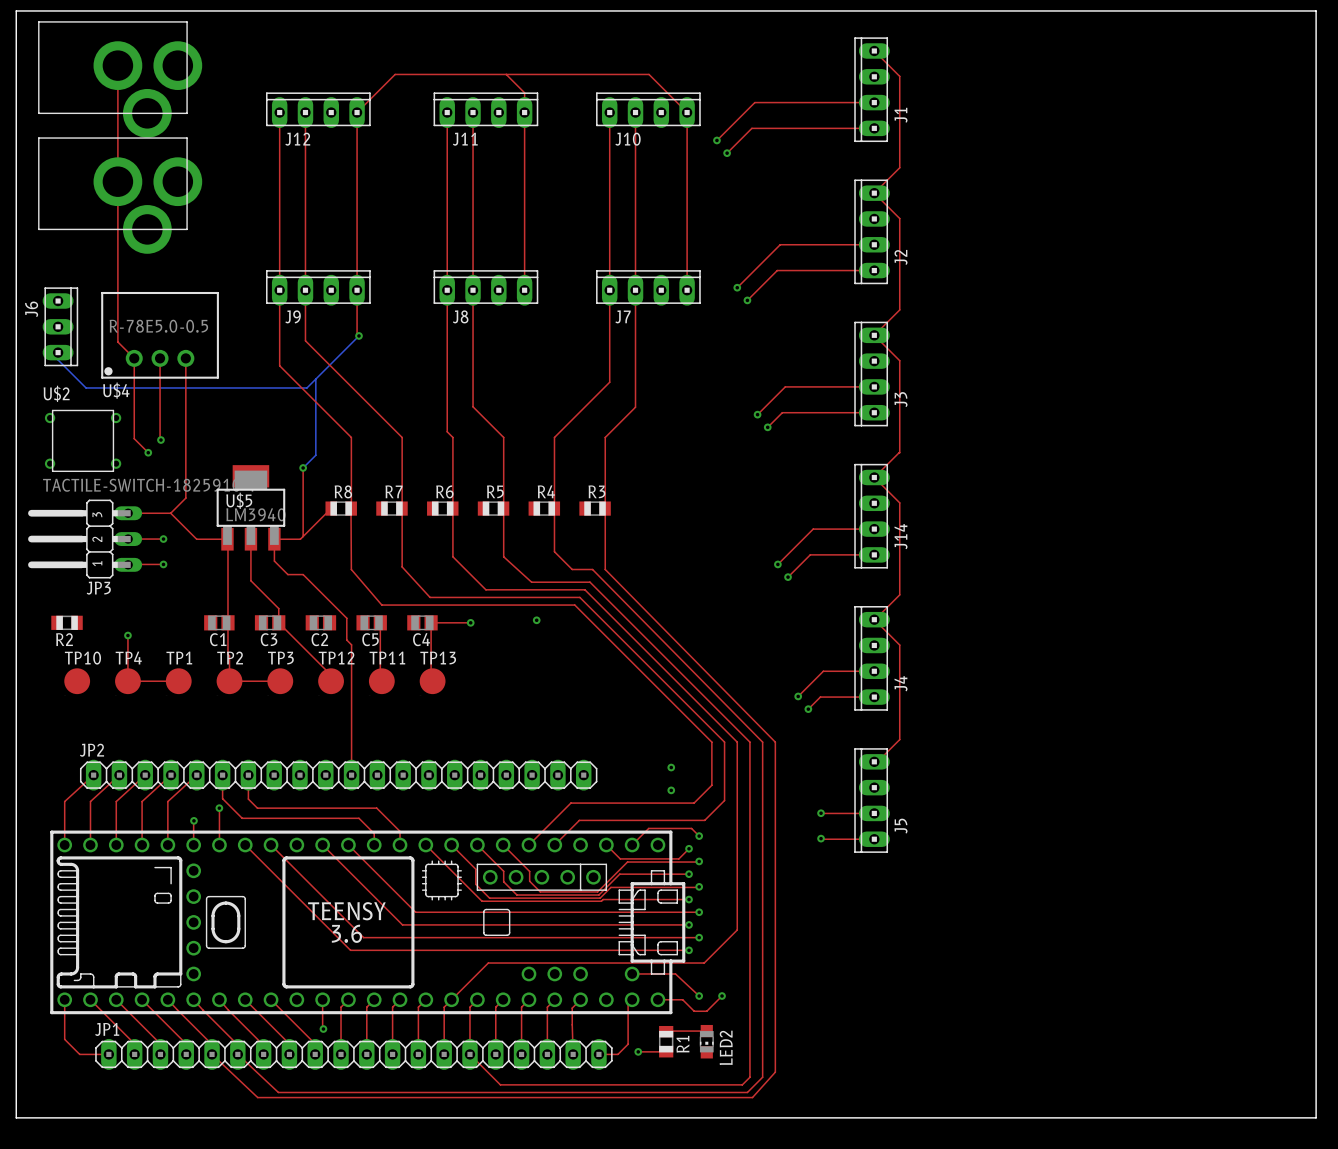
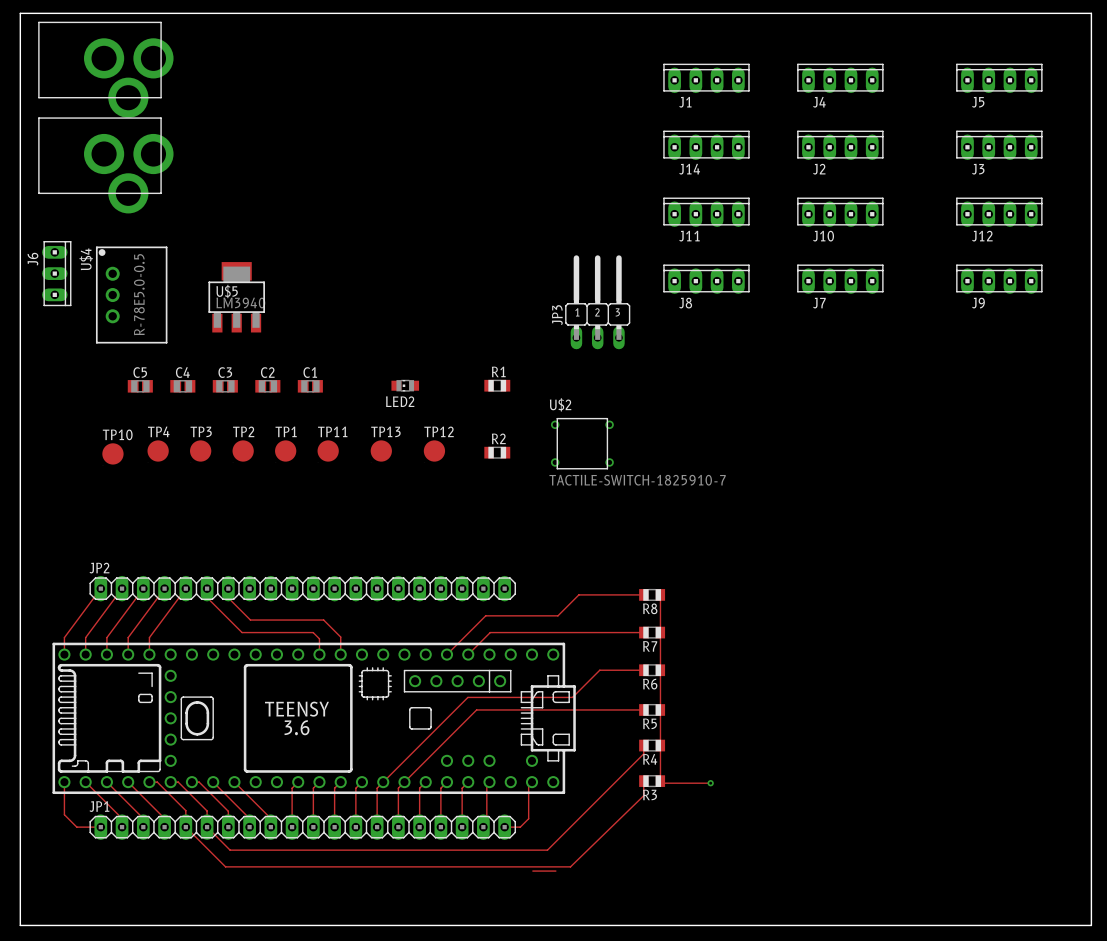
top track: (874, 50) (899, 76) (899, 167) (874, 193) (899, 218) (899, 309) (874, 335) (899, 360) (899, 452) (874, 477) (899, 502) (899, 594) (874, 619) (899, 645) (899, 739) (877, 761) (874, 761) -> none
top track: (117, 65) (117, 342) (134, 358) (134, 438) (148, 452) -> none
top track: (506, 74) (524, 92) (524, 290) -> none
J1 rotation: 0° (872, 89) -> 90° clockwise (706, 78)
top track: (874, 102) (754, 102) (716, 140) -> none
J12 position: (318, 110) -> (999, 212)
J11 position: (485, 110) -> (706, 212)
J10 position: (648, 110) -> (840, 212)
top track: (279, 112) (279, 365) (351, 437) (351, 510) -> none
top track: (305, 112) (305, 340) (402, 437) (402, 566) (430, 597) (579, 597) (724, 742) (724, 800) (704, 820) (579, 820) (554, 845) -> none
top track: (447, 112) (447, 431) (452, 437) (452, 556) (485, 589) (584, 589) (737, 742) (737, 930) (704, 963) (488, 963) (444, 1007) (444, 1054) -> none
top track: (473, 112) (473, 406) (503, 437) (503, 556) (531, 582) (590, 582) (749, 742) (749, 1077) (742, 1084) (500, 1084) (469, 1054) (469, 1007) (477, 999) -> none
top track: (609, 112) (609, 382) (554, 437) (554, 551) (572, 569) (592, 569) (762, 742) (762, 1077) (747, 1092) (278, 1092) (237, 1054) (237, 1044) (193, 999) -> none
top track: (635, 112) (635, 407) (605, 437) (605, 569) (775, 742) (775, 1072) (752, 1097) (257, 1097) (212, 1054) (212, 1044) (167, 999) -> none
top track: (874, 128) (751, 128) (727, 153) -> none
via: (716, 140) -> none
via: (727, 153) -> none
J2 rotation: 0° (872, 231) -> 90° clockwise (840, 145)
J2 position: (872, 231) -> (840, 145)
top track: (874, 244) (780, 244) (737, 287) -> none
top track: (874, 270) (777, 270) (747, 300) -> none
J9 position: (318, 287) -> (999, 279)
J8 position: (485, 287) -> (706, 279)
J7 position: (648, 287) -> (840, 279)
via: (737, 287) -> none
top track: (687, 290) (687, 112) (649, 74) (395, 74) (357, 112) (357, 334) (358, 335) -> none
via: (747, 300) -> none
U$4 rotation: 0° (160, 335) -> 90° clockwise (131, 295)
bottom track: (358, 335) (306, 387) (86, 387) (58, 360) (58, 352) -> none
via: (358, 335) -> none
top track: (160, 358) (160, 440) -> none
top track: (185, 358) (185, 498) (170, 513) -> none
J3 rotation: 0° (872, 374) -> 90° clockwise (999, 145)
J3 position: (872, 374) -> (999, 145)
bottom track: (315, 379) (315, 455) (303, 467) -> none
top track: (874, 386) (785, 386) (757, 414) -> none
top track: (874, 412) (782, 412) (767, 427) -> none
via: (757, 414) -> none
via: (767, 427) -> none
U$2 position: (83, 440) -> (582, 443)
via: (160, 440) -> none
via: (148, 452) -> none
top track: (303, 467) (303, 536) -> none
via: (303, 467) -> none
R8 name position: R8 (343, 491) -> R8 (650, 608)
R7 name position: R7 (394, 491) -> R7 (650, 646)
R6 name position: R6 (444, 491) -> R6 (650, 684)
R5 name position: R5 (495, 491) -> R5 (649, 723)
R4 name position: R4 (546, 491) -> R4 (650, 759)
R3 name position: R3 (596, 491) -> R3 (650, 794)
U$5 position: (250, 507) -> (236, 297)
top track: (331, 508) (300, 539) (274, 539) (274, 561) (287, 574) (303, 574) (346, 618) (346, 640) (351, 644) (351, 775) -> none
R8 position: (341, 508) -> (652, 594)
R7 position: (391, 508) -> (652, 632)
R6 position: (442, 508) -> (652, 670)
R5 position: (493, 508) -> (652, 709)
R4 position: (544, 508) -> (652, 745)
R3 position: (595, 508) -> (652, 781)
top track: (351, 510) (351, 569) (381, 605) (574, 605) (711, 742) (711, 785) (694, 803) (570, 803) (528, 845) -> none
top track: (128, 513) (170, 513) -> none
top track: (170, 513) (196, 539) (227, 539) -> none
J14 rotation: 0° (872, 516) -> 90° clockwise (706, 145)
J14 position: (872, 516) -> (706, 145)
top track: (874, 529) (813, 529) (777, 564) -> none
JP3 rotation: 0° (85, 539) -> 90° clockwise (597, 302)
JP3 position: (85, 539) -> (597, 302)
top track: (128, 539) (163, 539) -> none
via: (163, 539) -> none
top track: (226, 539) (229, 655) (227, 679) (280, 681) -> none
top track: (250, 539) (250, 580) (278, 608) (278, 622) (331, 675) (331, 681) -> none
top track: (874, 554) (810, 554) (788, 577) -> none
top track: (163, 564) (128, 564) -> none
via: (163, 564) -> none
via: (777, 564) -> none
via: (788, 577) -> none
via: (536, 620) -> none
R2 position: (67, 622) -> (497, 452)
C1 position: (219, 622) -> (310, 386)
C3 position: (270, 622) -> (225, 386)
C2 position: (320, 622) -> (267, 386)
C5 position: (371, 622) -> (140, 386)
top track: (380, 622) (381, 681) -> none
C4 position: (422, 622) -> (182, 386)
top track: (470, 622) (431, 622) (432, 681) -> none
via: (470, 622) -> none
top track: (127, 635) (127, 681) (178, 681) -> none
via: (127, 635) -> none
R2 name position: R2 (64, 639) -> R2 (498, 438)
C1 name position: C1 (218, 639) -> C1 (310, 372)
C3 name position: C3 (269, 639) -> C3 (225, 372)
C2 name position: C2 (319, 639) -> C2 (267, 372)
C5 name position: C5 (370, 639) -> C5 (140, 372)
C4 name position: C4 (421, 639) -> C4 (182, 372)
J4 rotation: 0° (872, 658) -> 90° clockwise (840, 78)
J4 position: (872, 658) -> (840, 78)
top track: (874, 671) (823, 671) (798, 696) -> none
TP10 position: (77, 681) -> (112, 453)
TP4 position: (127, 681) -> (158, 450)
TP1 position: (178, 681) -> (285, 450)
TP2 position: (229, 681) -> (243, 450)
TP3 position: (280, 681) -> (200, 450)
TP12 position: (331, 681) -> (434, 450)
TP11 position: (381, 681) -> (328, 450)
TP13 position: (432, 681) -> (381, 450)
via: (798, 696) -> none
top track: (874, 697) (820, 697) (808, 709) -> none
top track: none -> (100, 588) (64, 637) (64, 654)
top track: none -> (122, 588) (85, 637) (85, 654)
top track: none -> (143, 588) (106, 637) (106, 654)
top track: none -> (164, 588) (128, 637) (128, 654)
top track: none -> (185, 588) (149, 637) (149, 654)
top track: none -> (207, 588) (207, 597) (242, 632) (313, 632) (319, 638) (319, 654)
top track: none -> (228, 588) (228, 597) (250, 620) (323, 620) (340, 637) (340, 654)
via: (808, 709) -> none
top track: none -> (643, 594) (578, 594) (557, 615) (485, 615) (447, 654)
top track: none -> (660, 594) (660, 781) (662, 783) (710, 783)
top track: none -> (643, 632) (490, 632) (468, 654)
via: (671, 767) -> none
top track: (93, 775) (64, 801) (64, 845) -> none
top track: (119, 775) (90, 801) (90, 845) -> none
top track: (145, 775) (116, 801) (116, 845) -> none
top track: (171, 775) (142, 801) (142, 845) -> none
top track: (196, 775) (167, 801) (167, 845) -> none
top track: (222, 775) (222, 798) (242, 818) (358, 818) (374, 833) (374, 845) -> none
top track: (248, 775) (248, 799) (257, 808) (376, 808) (400, 831) (400, 845) -> none
JP2 position: (338, 775) -> (302, 588)
via: (671, 790) -> none
J5 rotation: 0° (872, 800) -> 90° clockwise (999, 78)
J5 position: (872, 800) -> (999, 78)
top track: (219, 808) (219, 845) -> none
via: (219, 808) -> none
top track: none -> (643, 670) (599, 670) (572, 697) (467, 697) (377, 788) (377, 827)
top track: (821, 813) (874, 813) -> none
via: (821, 813) -> none
top track: (193, 820) (193, 845) -> none
via: (193, 820) -> none
top track: (699, 836) (691, 828) (648, 828) (632, 845) (632, 850) -> none
via: (699, 836) -> none
top track: (821, 838) (874, 839) -> none
via: (821, 838) -> none
top track: (245, 845) (350, 950) (689, 950) -> none
top track: (271, 845) (363, 937) (699, 937) -> none
top track: (322, 845) (402, 924) (689, 924) -> none
top track: (348, 845) (415, 912) (699, 912) -> none
top track: (425, 845) (482, 901) (689, 899) -> none
top track: (451, 845) (475, 869) (475, 884) (489, 898) (600, 898) (610, 887) (699, 886) -> none
top track: (477, 845) (503, 871) (503, 881) (516, 895) (598, 895) (619, 874) (689, 874) -> none
top track: (503, 845) (529, 871) (529, 881) (540, 891) (597, 891) (627, 862) (699, 861) -> none
top track: (606, 845) (620, 858) (678, 858) (689, 848) -> none
via: (689, 848) -> none
top track: none -> (643, 709) (476, 709) (398, 788) (398, 827)
via: (699, 861) -> none
via: (689, 874) -> none
via: (699, 886) -> none
via: (689, 899) -> none
top track: none -> (643, 745) (643, 753) (547, 850) (230, 850) (207, 827) (207, 810) (178, 782) (170, 782)
via: (699, 912) -> none
part position: (367, 922) -> (314, 718)
via: (689, 924) -> none
via: (699, 937) -> none
top track: none -> (643, 781) (643, 795) (570, 866) (225, 866) (185, 827) (185, 810) (157, 782) (149, 782)
top track: none -> (191, 782) (199, 782) (228, 811) (228, 827)
top track: none -> (489, 782) (486, 784) (486, 823) (483, 827)
via: none -> (710, 783)
via: (689, 950) -> none
top track: (632, 973) (675, 973) (699, 996) -> none
via: (699, 996) -> none
top track: (722, 996) (706, 1011) (694, 1011) (682, 999) (657, 999) -> none
via: (722, 996) -> none
top track: (64, 999) (64, 1039) (79, 1054) (108, 1054) -> (64, 782) (64, 814) (76, 827) (100, 827)
top track: (90, 999) (134, 1043) (134, 1054) -> (85, 782) (122, 818) (122, 827)
top track: (116, 999) (160, 1043) (160, 1054) -> (106, 782) (143, 818) (143, 827)
top track: (142, 999) (186, 1043) (186, 1054) -> (128, 782) (164, 818) (164, 827)
top track: (219, 999) (263, 1045) (263, 1054) -> none
top track: (245, 999) (289, 1043) (289, 1054) -> (213, 782) (249, 818) (249, 827)
top track: (271, 999) (315, 1043) (315, 1054) -> (234, 782) (270, 818) (270, 827)
top track: (322, 999) (323, 1029) -> none
top track: (348, 999) (341, 1007) (341, 1054) -> (298, 782) (292, 788) (292, 827)
top track: (374, 999) (366, 1007) (366, 1054) -> (319, 782) (313, 788) (313, 827)
top track: (400, 999) (392, 1007) (392, 1054) -> (340, 782) (334, 788) (334, 827)
top track: (425, 999) (418, 1007) (418, 1054) -> (361, 782) (355, 788) (355, 827)
top track: (503, 999) (495, 1007) (495, 1054) -> (425, 782) (419, 788) (419, 827)
top track: (528, 999) (521, 1007) (521, 1054) -> (447, 782) (440, 788) (440, 827)
top track: (554, 999) (547, 1007) (547, 1054) -> (468, 782) (462, 788) (462, 827)
top track: (580, 999) (572, 1008) (573, 1054) -> none
top track: (632, 999) (628, 1003) (628, 1044) (617, 1054) (598, 1054) -> (532, 782) (528, 785) (528, 818) (520, 827) (504, 827)
via: (323, 1029) -> none
top track: (706, 1031) (666, 1031) -> none
R1 rotation: 0° (666, 1041) -> 90° clockwise (497, 385)
R1 position: (666, 1041) -> (497, 385)
LED2 rotation: 0° (706, 1041) -> 90° clockwise (405, 385)
LED2 position: (706, 1041) -> (405, 385)
R1 name position: R1 (682, 1044) -> R1 (498, 371)
via: (638, 1051) -> none
JP1 position: (353, 1054) -> (302, 827)

